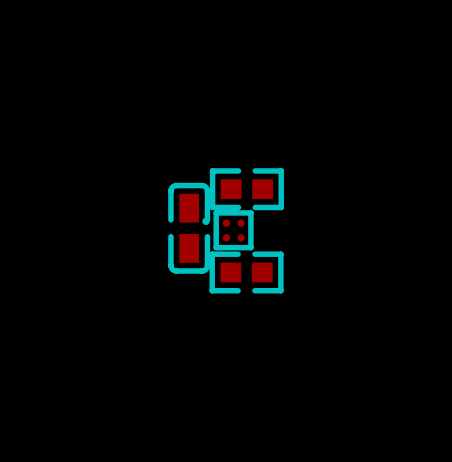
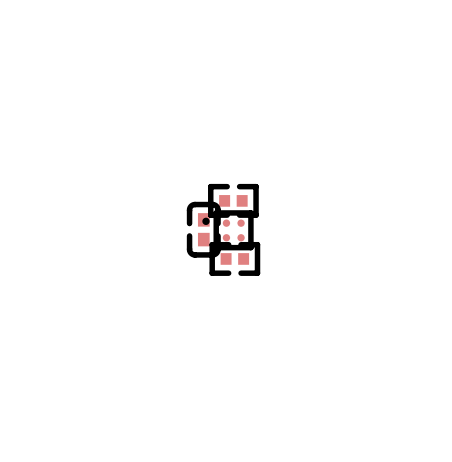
part footprint: [209, 168, 284, 211] -> [208, 183, 259, 218]
part footprint: [168, 182, 211, 274] -> [186, 201, 221, 258]
part footprint: [209, 251, 284, 294] -> [209, 241, 261, 276]

